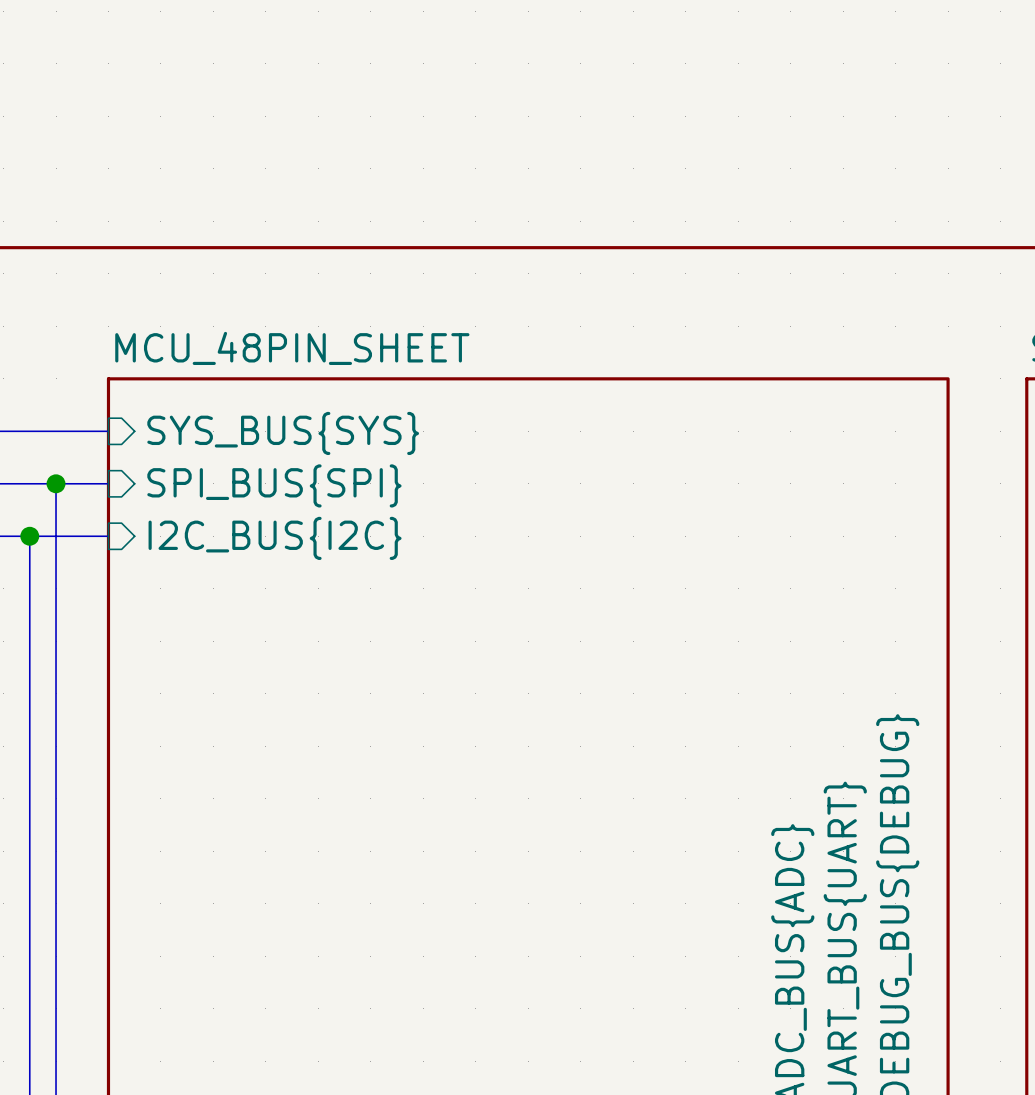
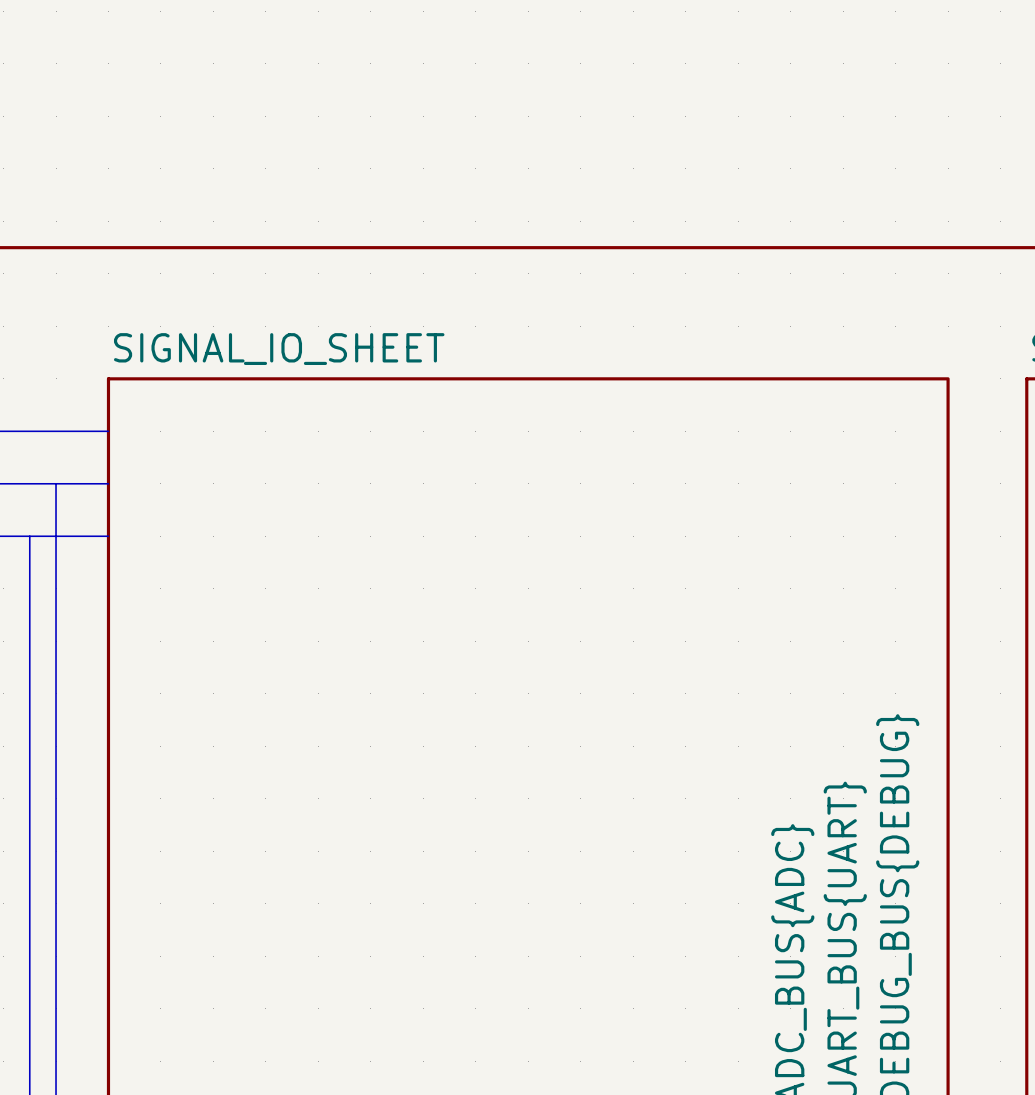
sheet MCU_48PIN_SHEET name: MCU_48PIN_SHEET (292, 348) -> SIGNAL_IO_SHEET (279, 349)
sheet pin: SYS_BUS{SYS} (283, 433) -> none
junction: (56, 483) -> none
sheet pin: SPI_BUS{SPI} (274, 485) -> none
junction: (29, 536) -> none
sheet pin: I2C_BUS{I2C} (275, 538) -> none

